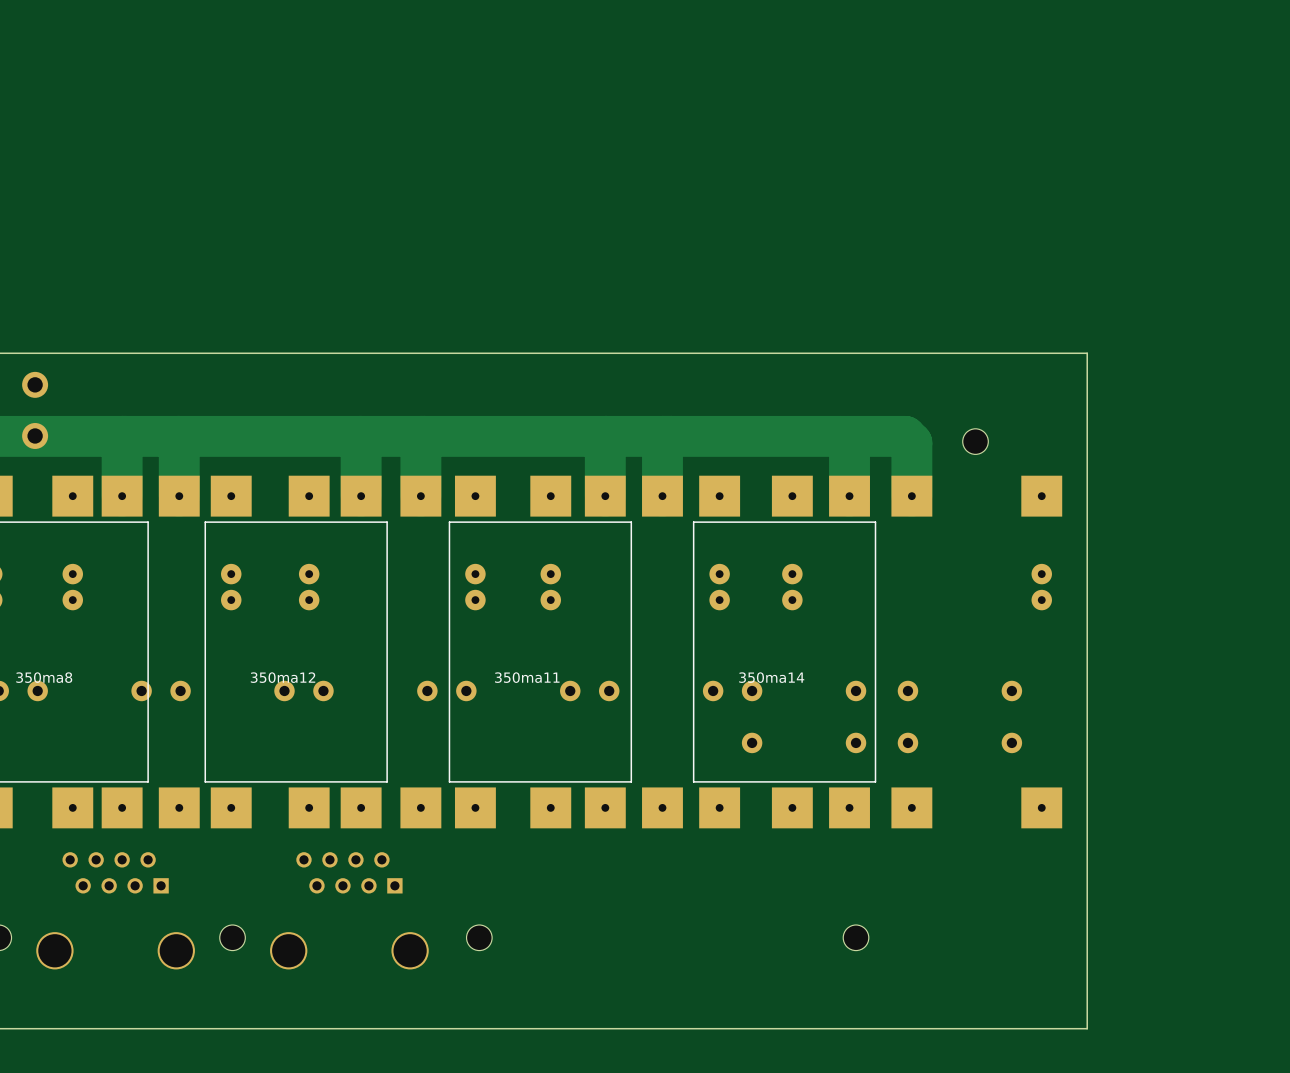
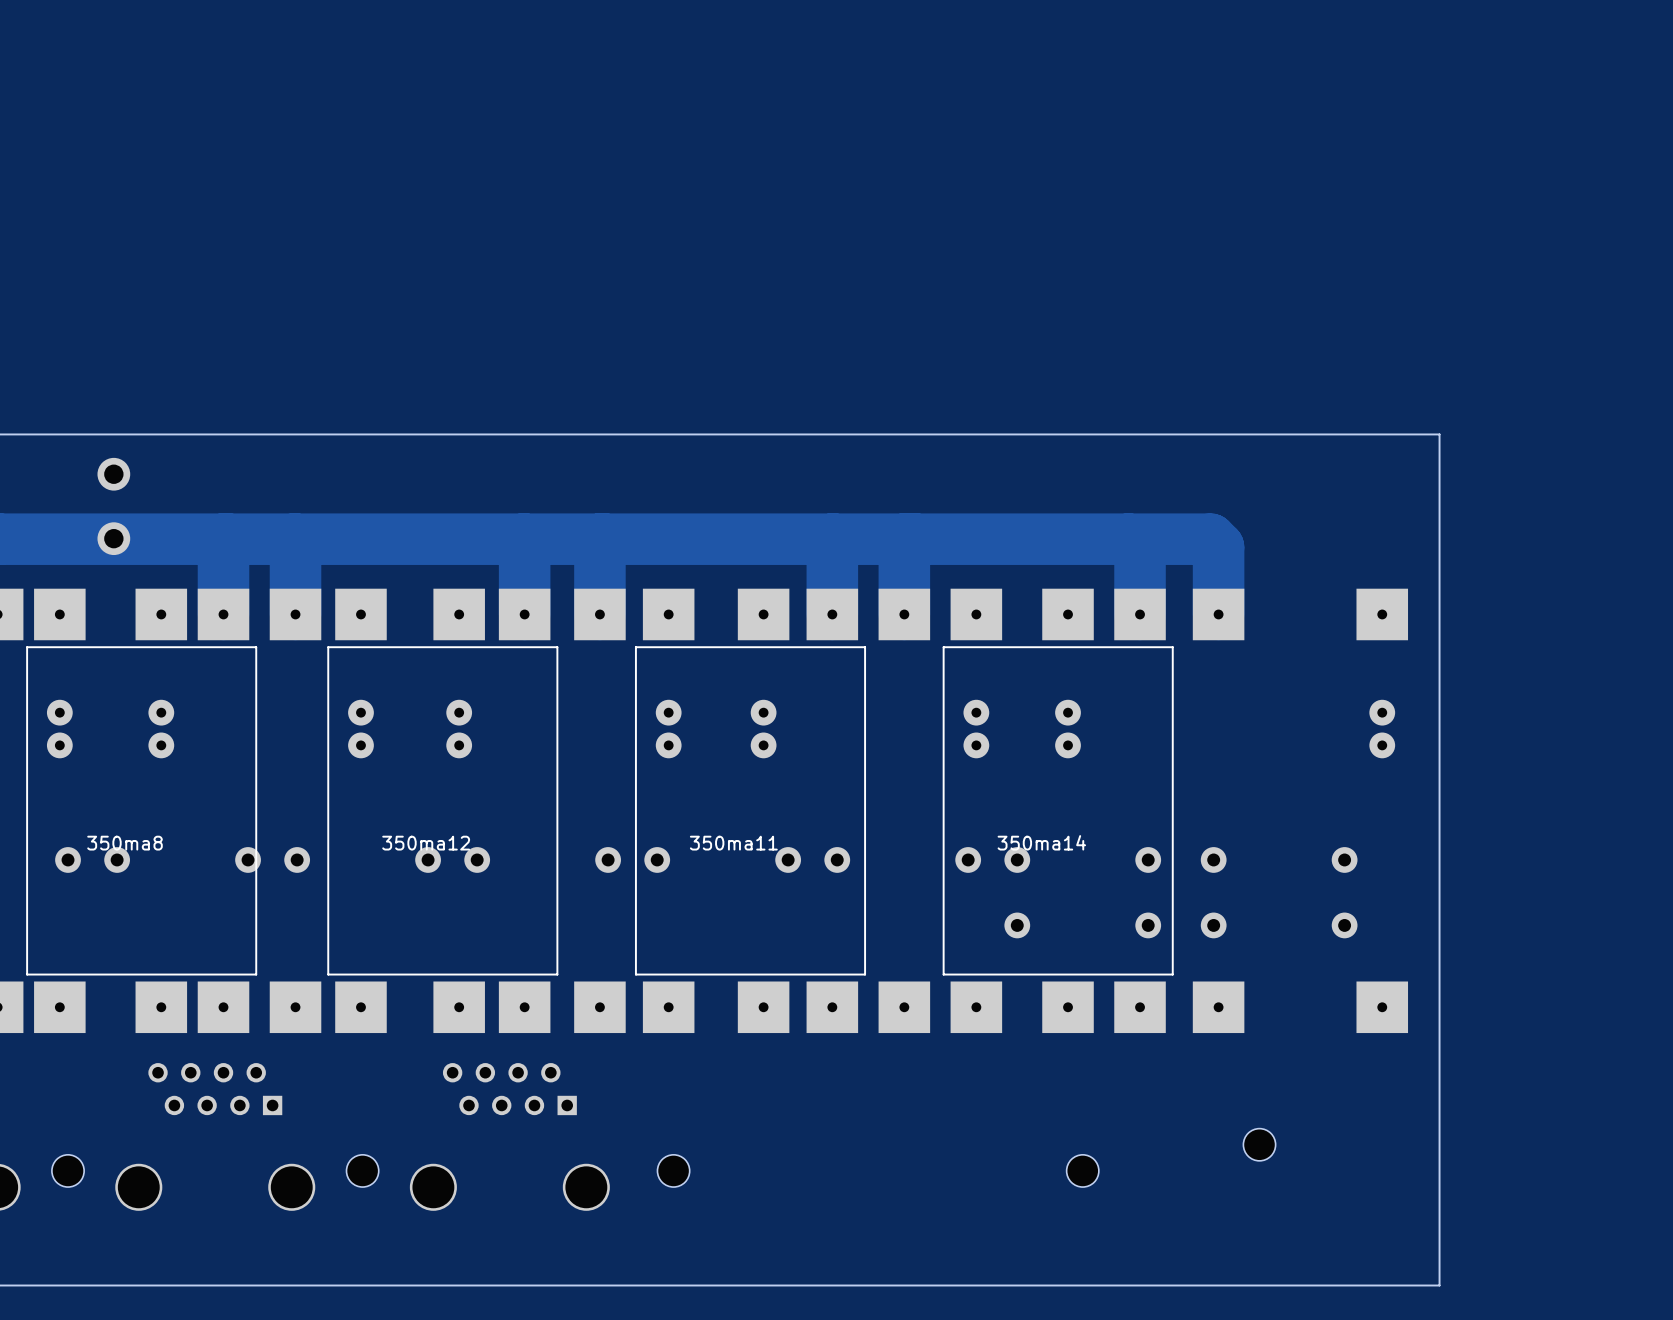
part: (975, 441) -> none
part: none -> (1259, 1144)
part: none -> (1082, 1170)
part: (856, 937) -> none

